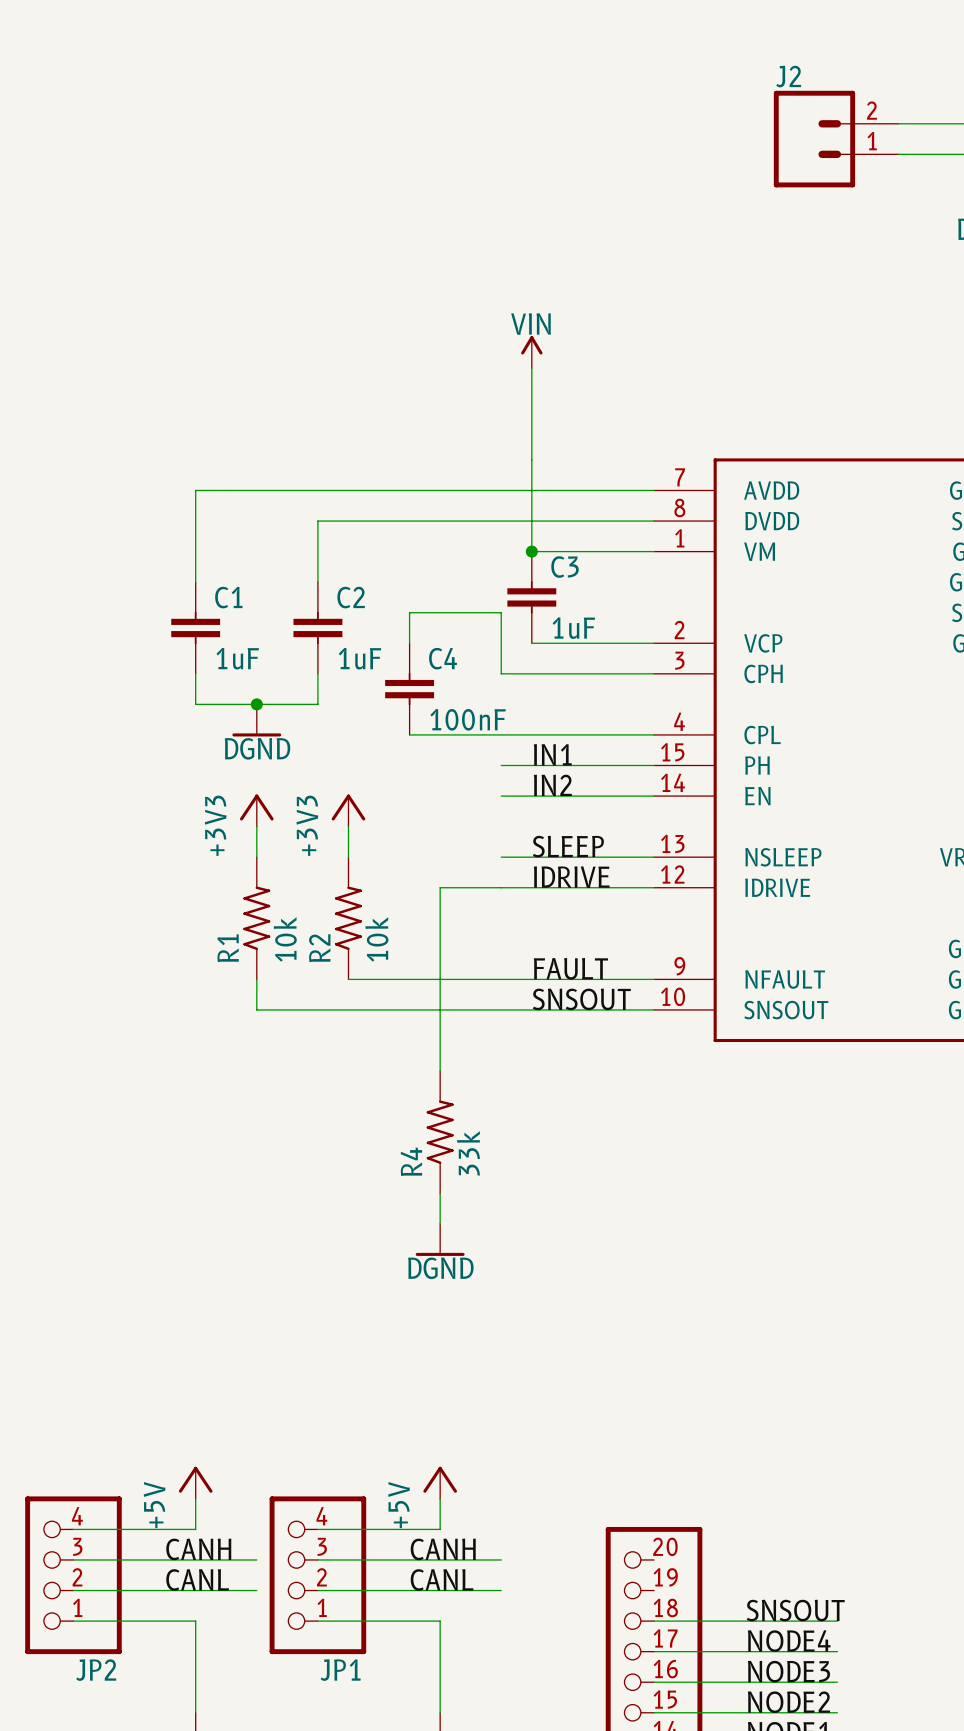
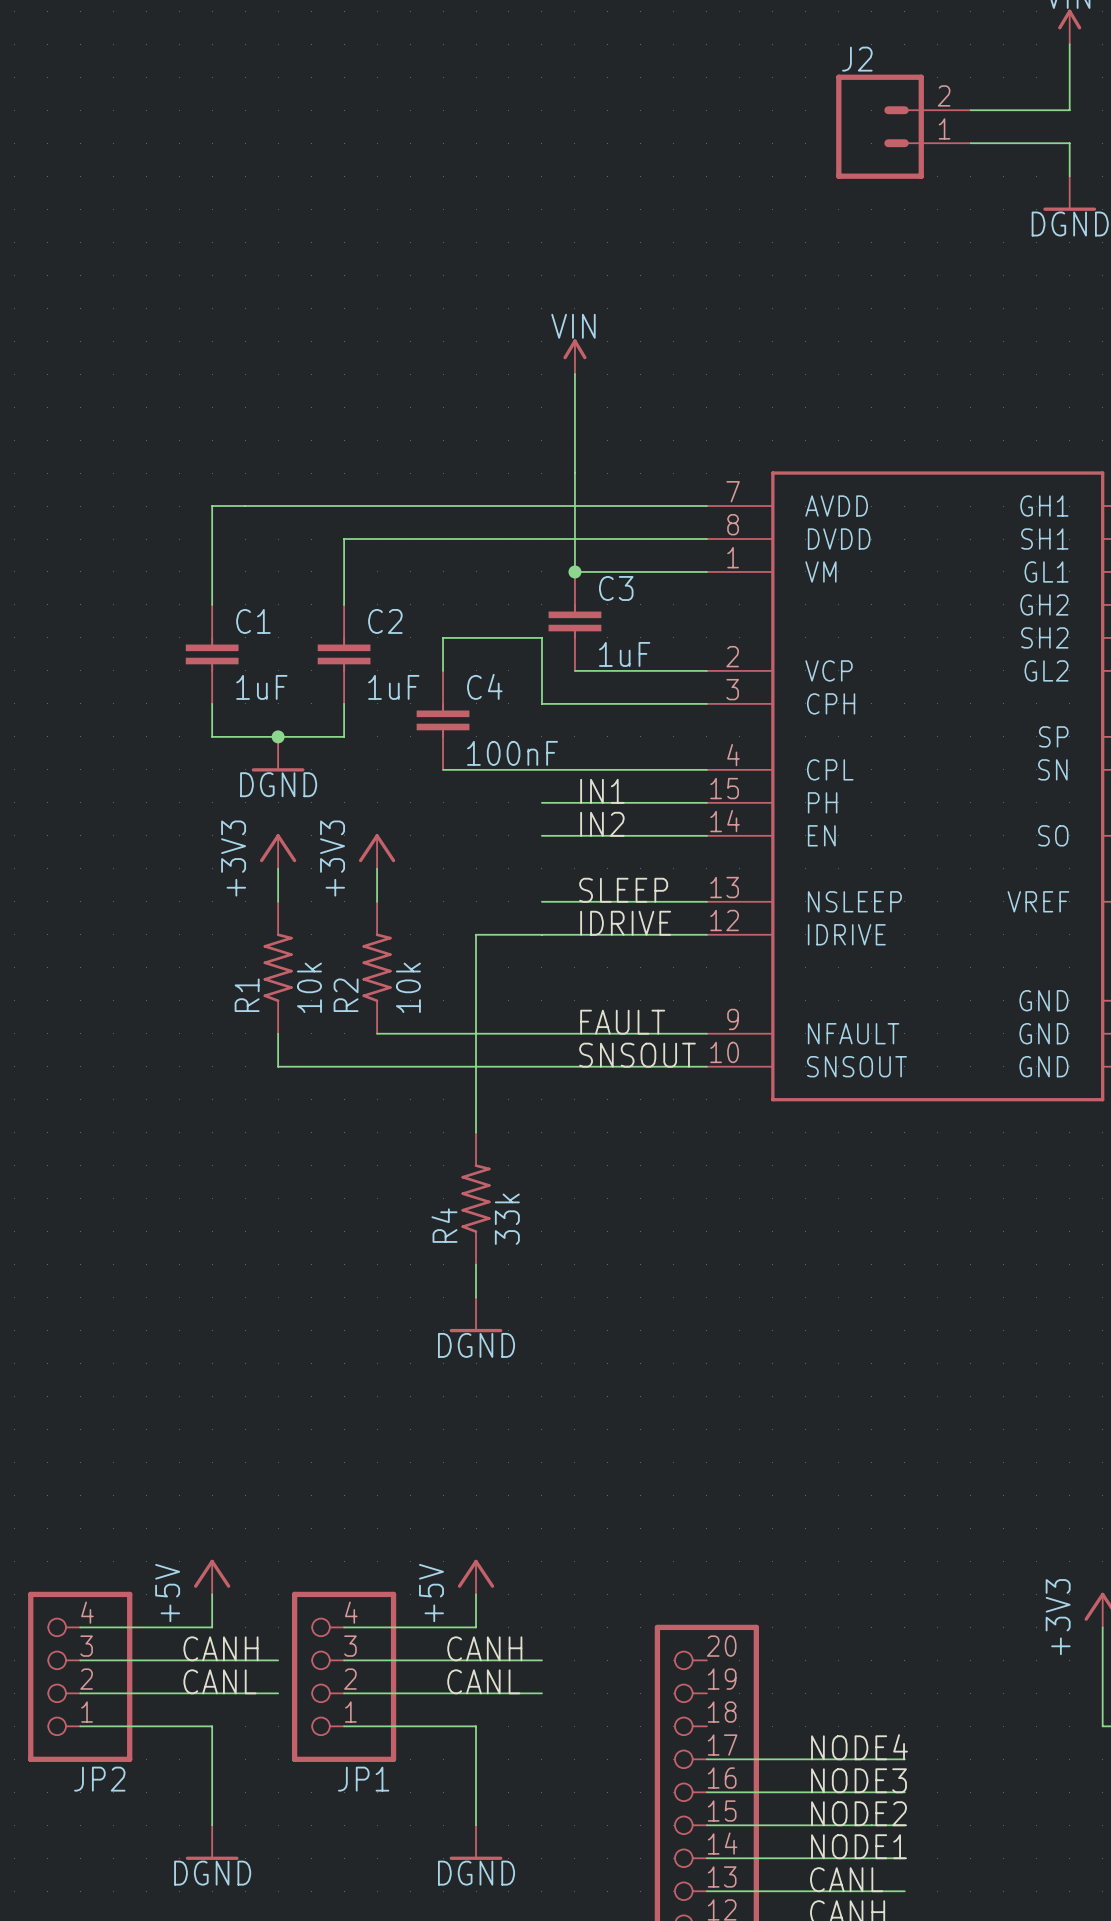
label: SNSOUT (795, 1610) -> none
wire: (654, 1621) (837, 1621) -> none

